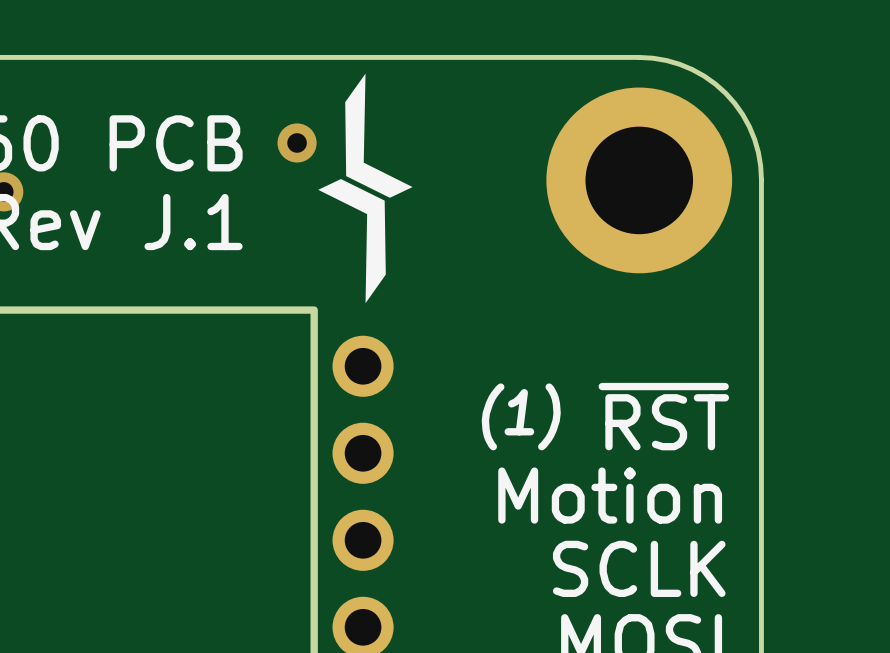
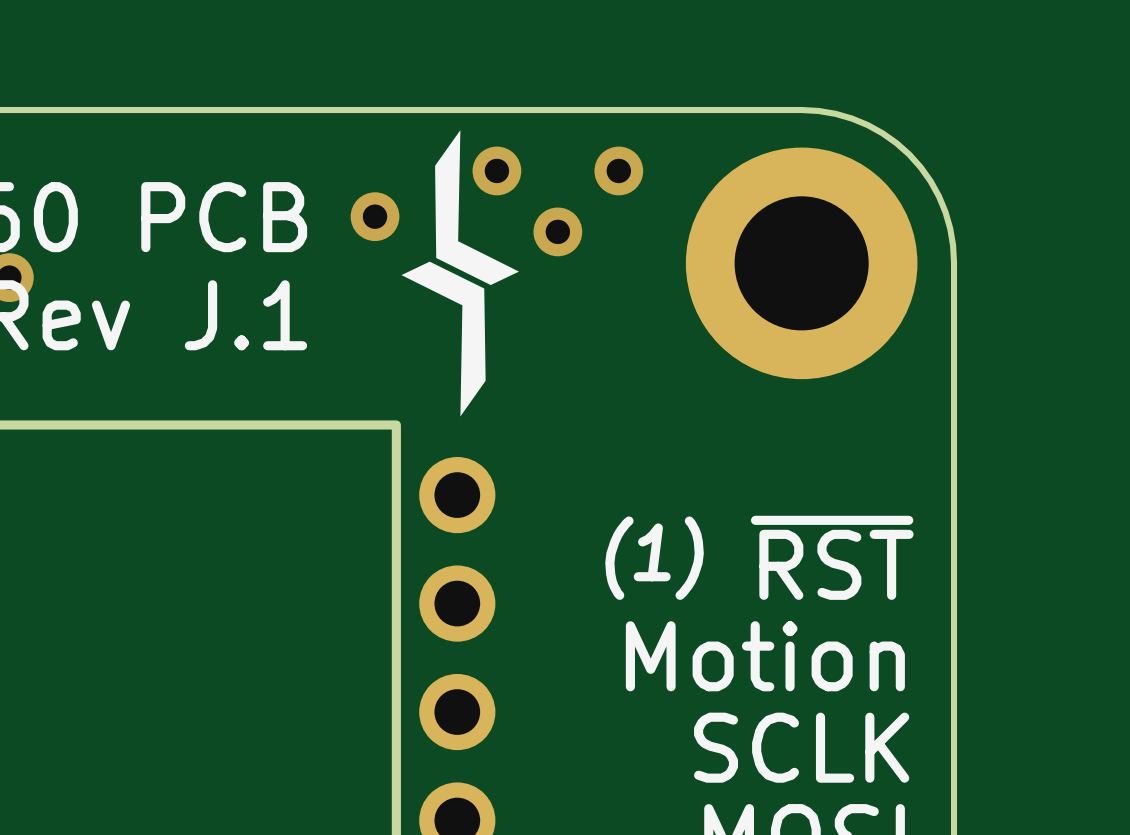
via: none -> (496, 170)
via: none -> (618, 170)
via: none -> (557, 231)

